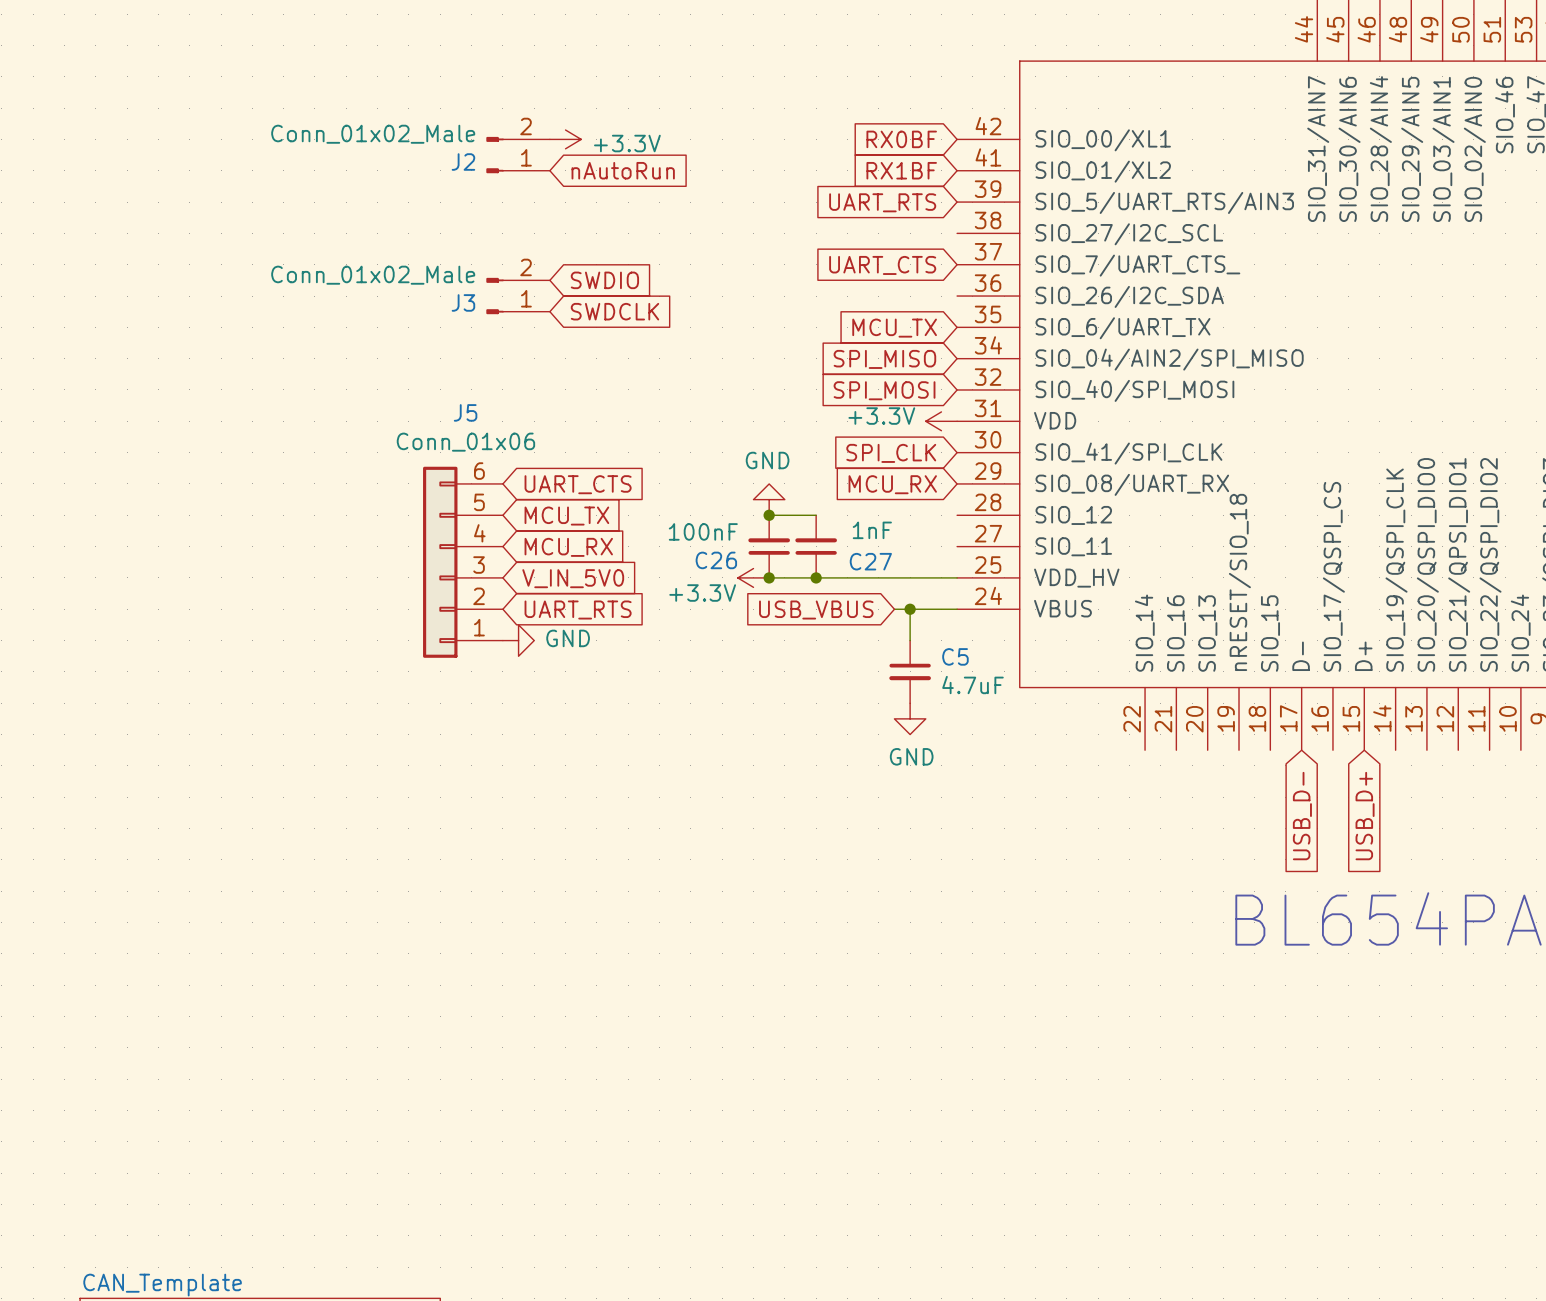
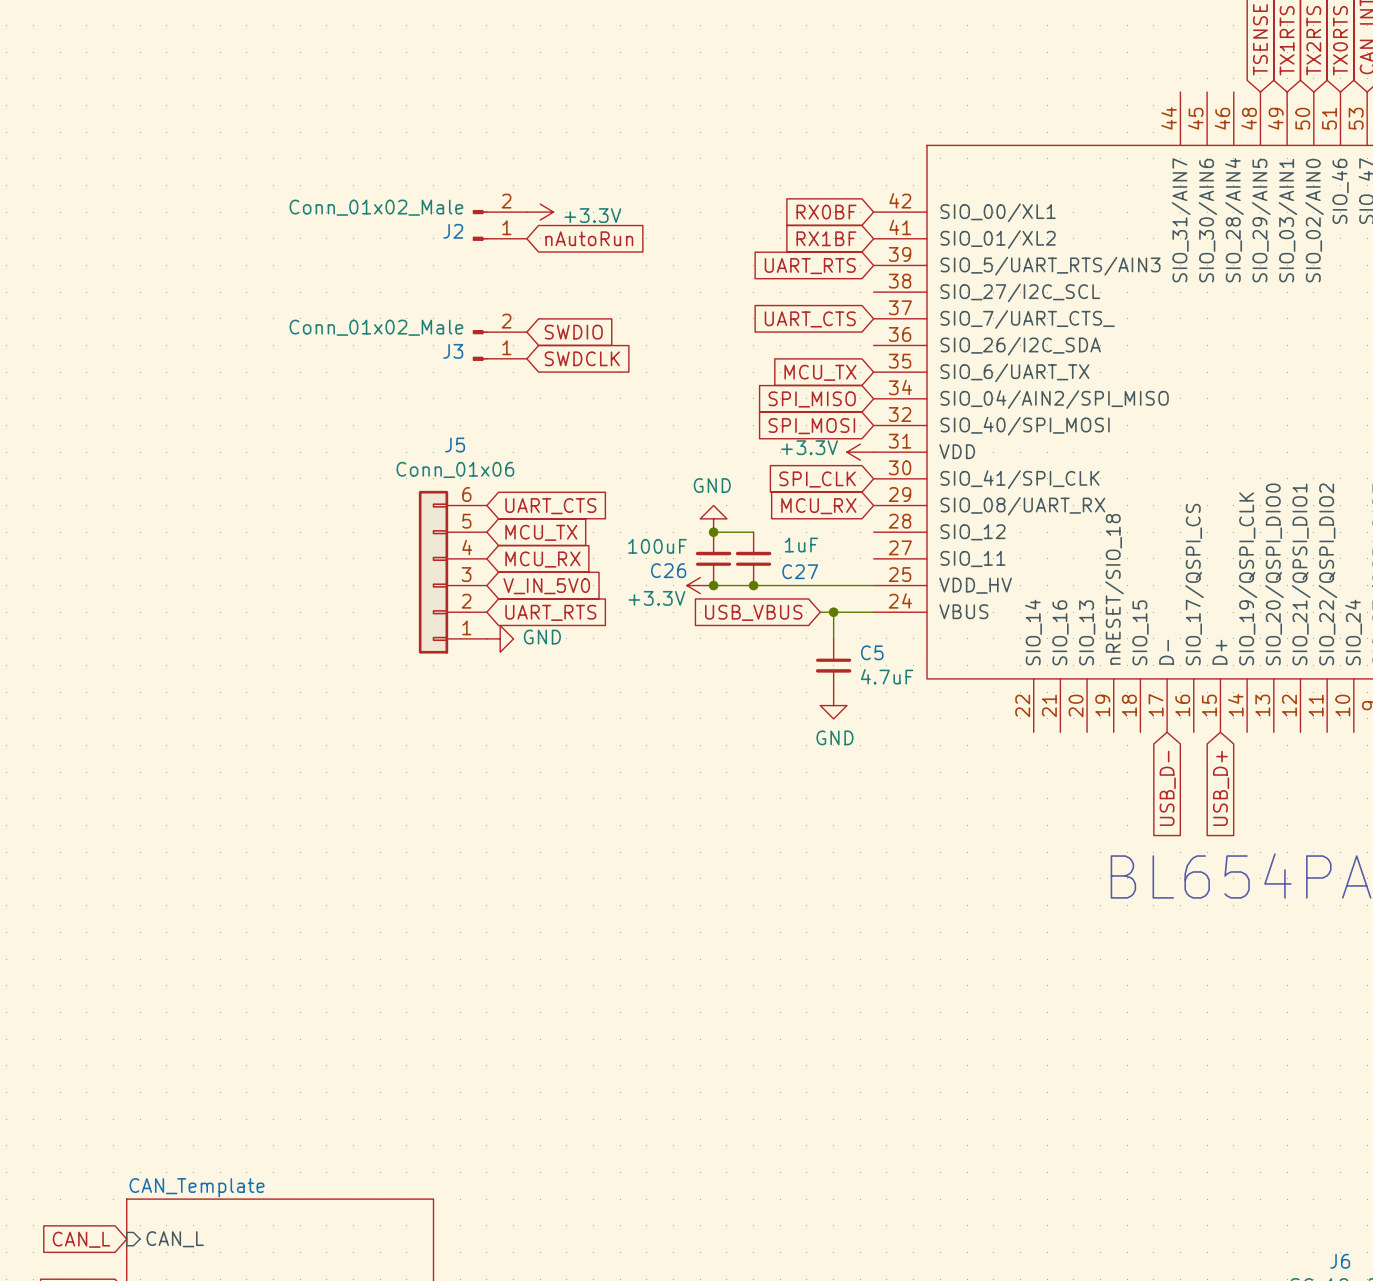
C27 value: 1nF (872, 530) -> 1uF (801, 545)
C26 value: 100nF (703, 531) -> 100uF (657, 546)

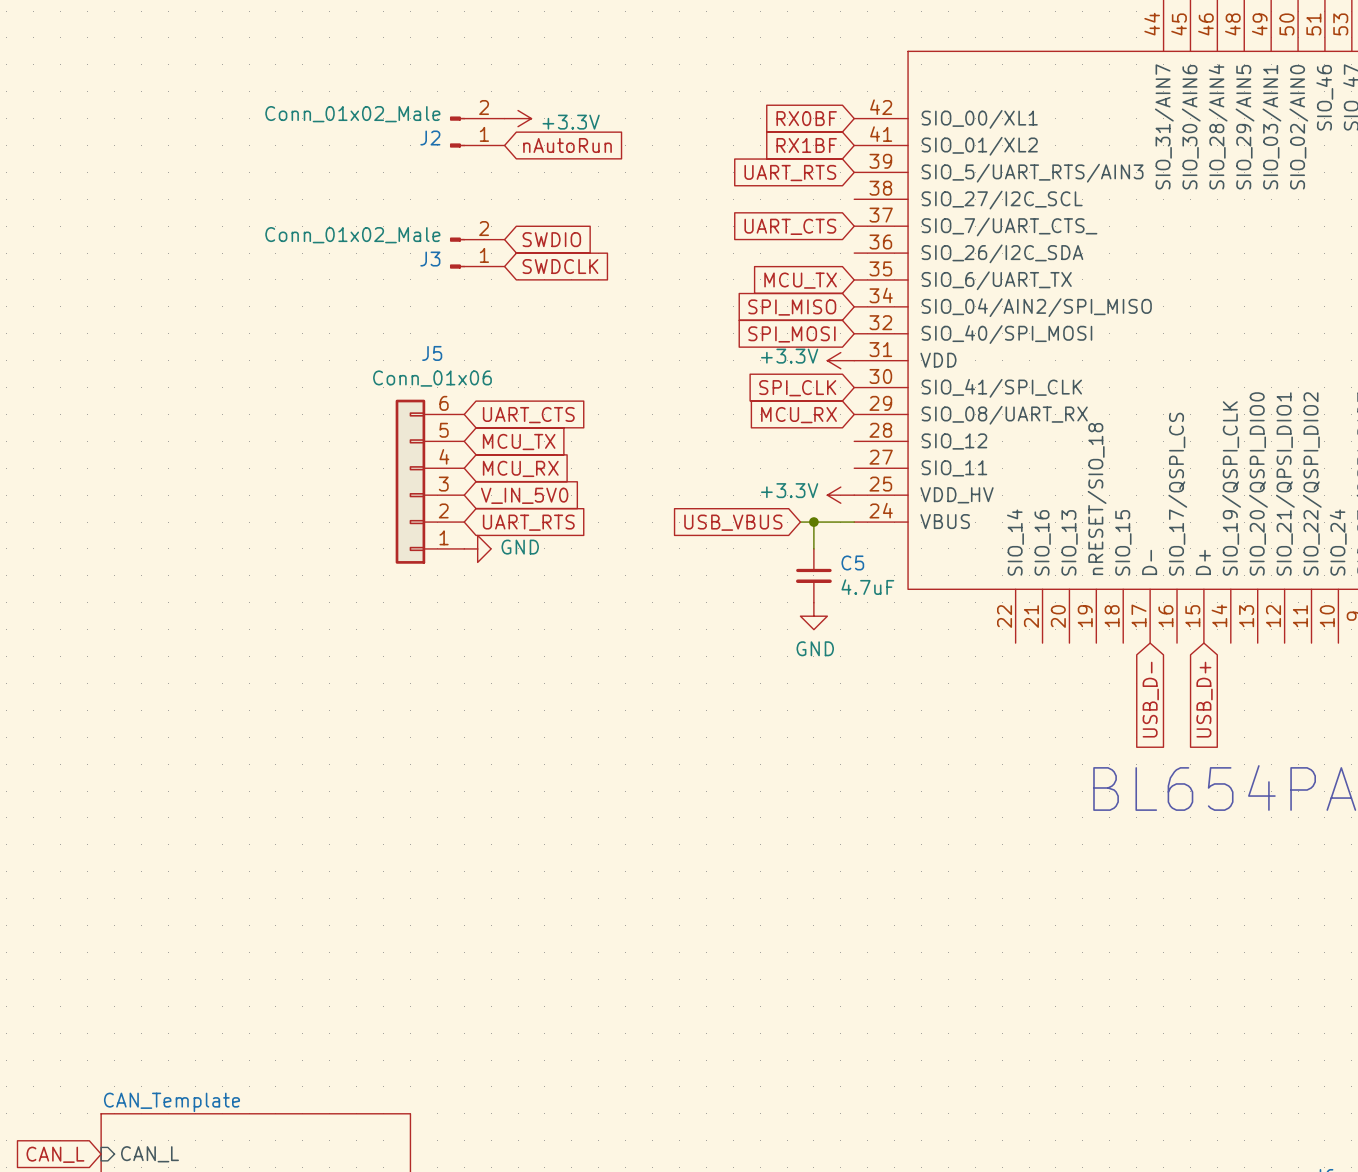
power symbol: GND (713, 518) -> none
wire: (713, 532) (753, 532) -> none
junction: (713, 532) -> none
C26: 100uF (713, 558) -> none
C27: 1uF (753, 558) -> none
power symbol position: +3.3V (700, 585) -> +3.3V (840, 495)
wire: (713, 585) (873, 585) -> none
junction: (713, 585) -> none
junction: (753, 585) -> none
power symbol text position: +3.3V (656, 598) -> +3.3V (789, 490)

